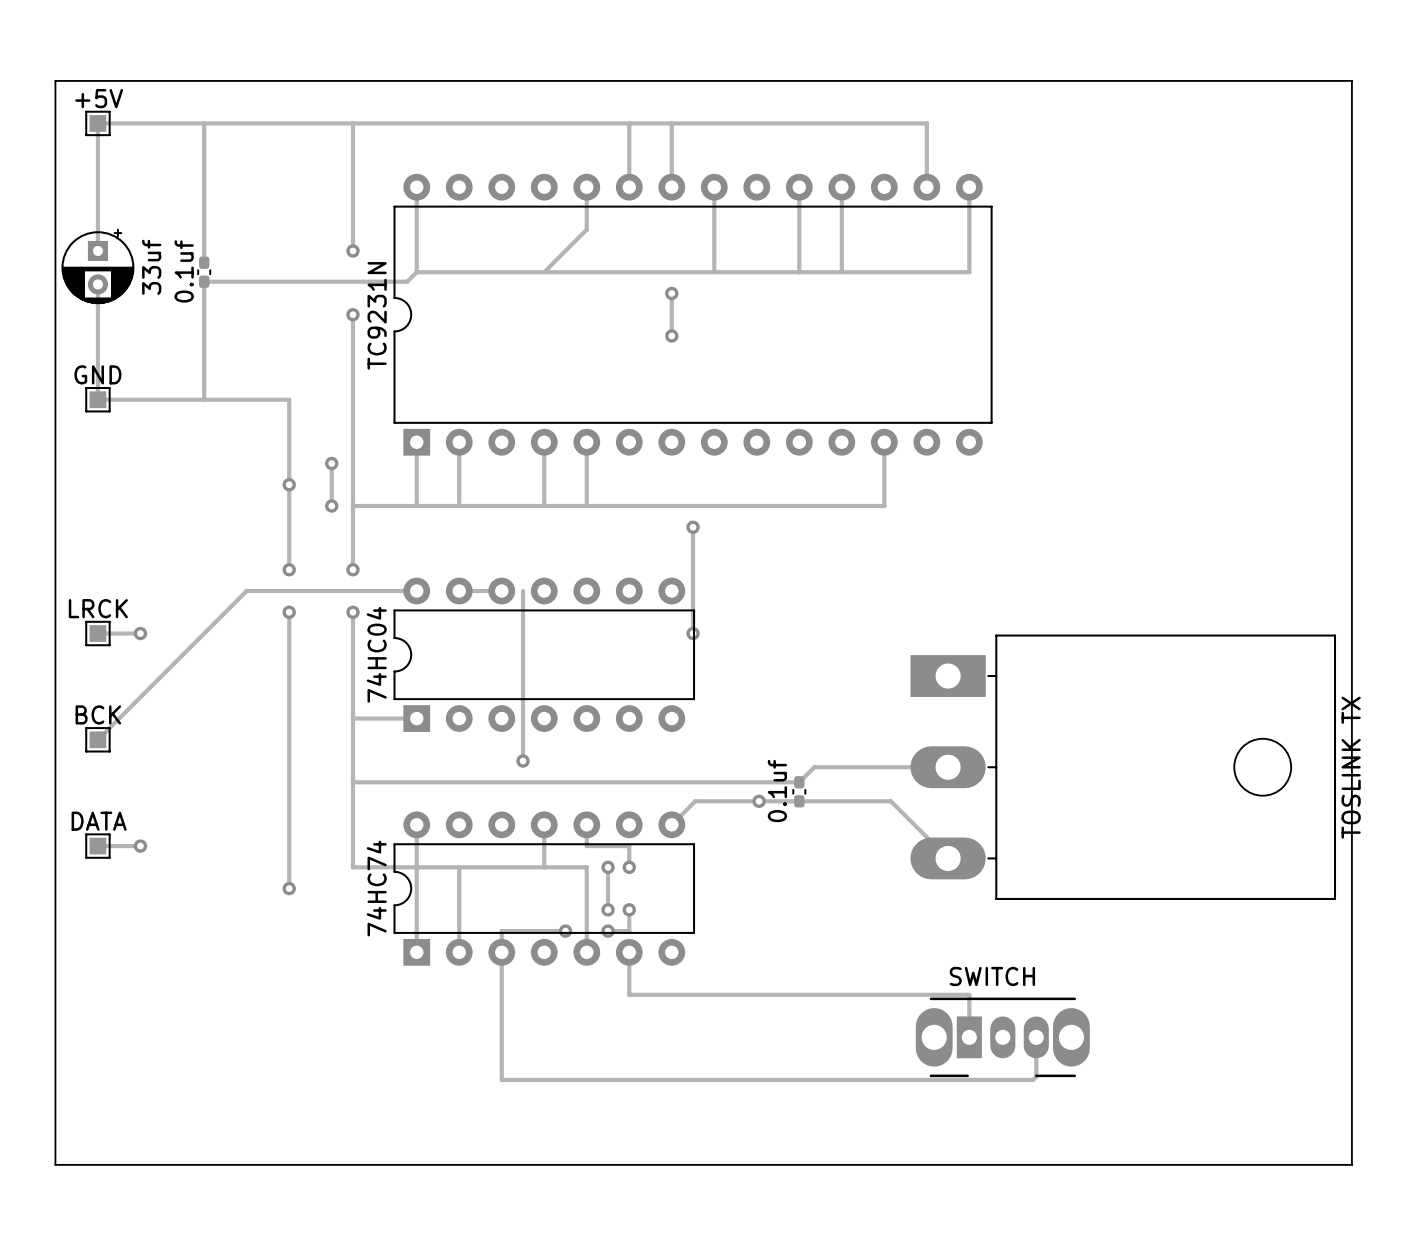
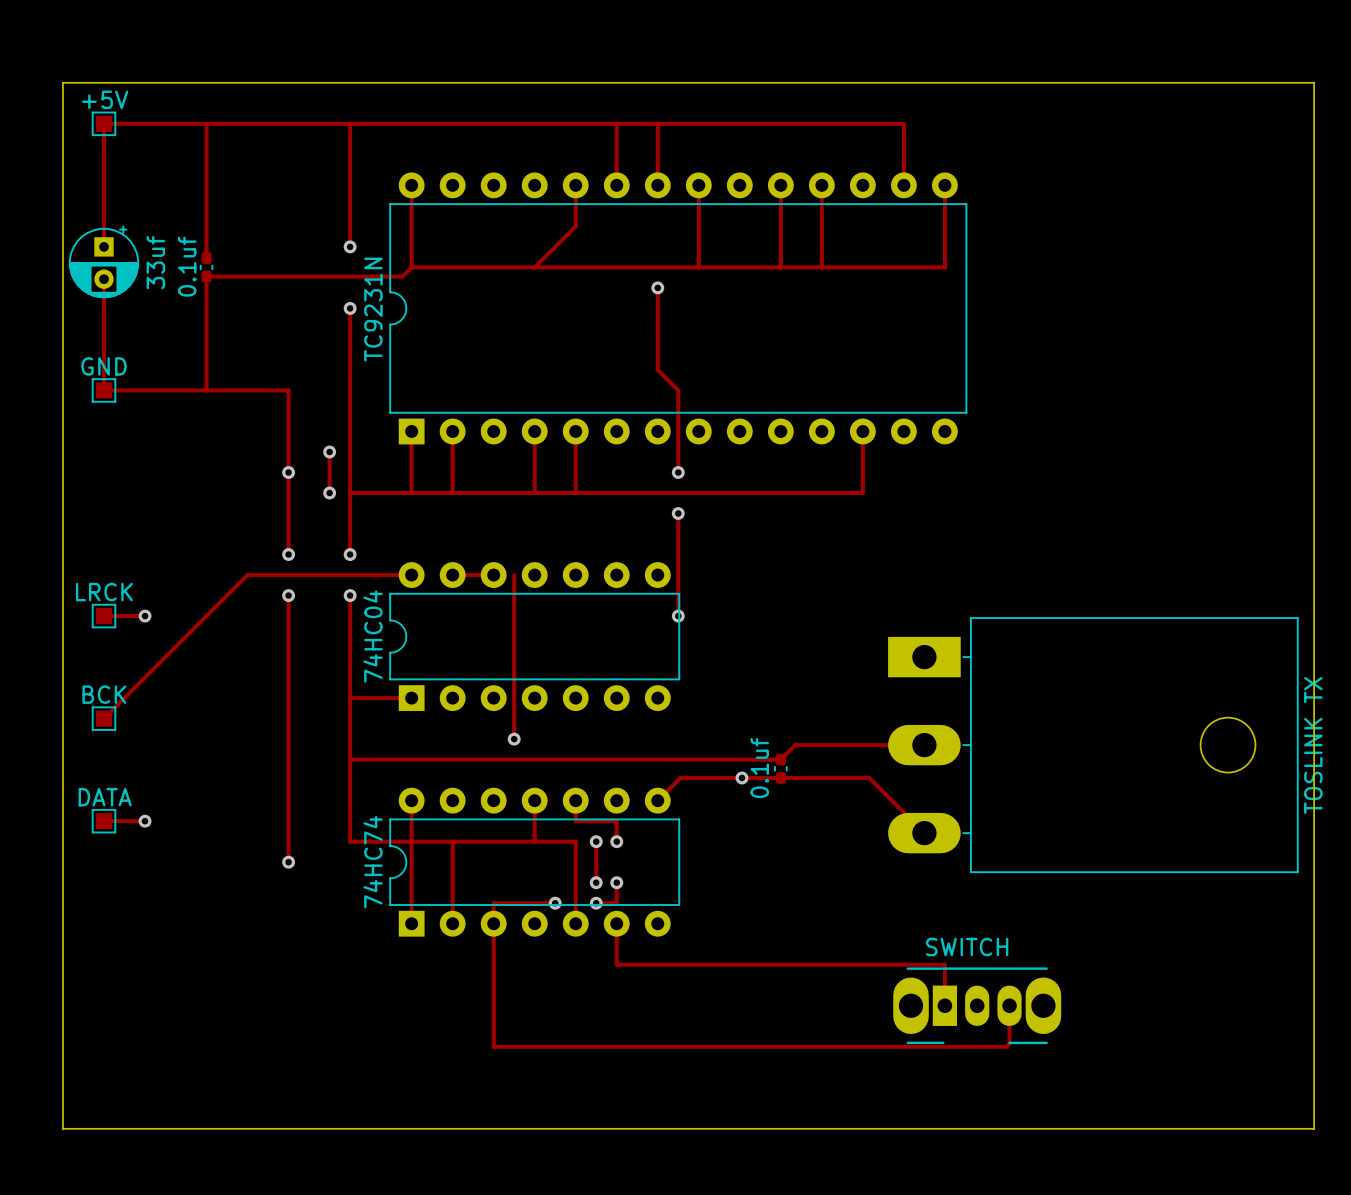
track: none -> (657, 328) (657, 369) (678, 390) (678, 472)
via: (671, 335) -> none
via: none -> (678, 472)

